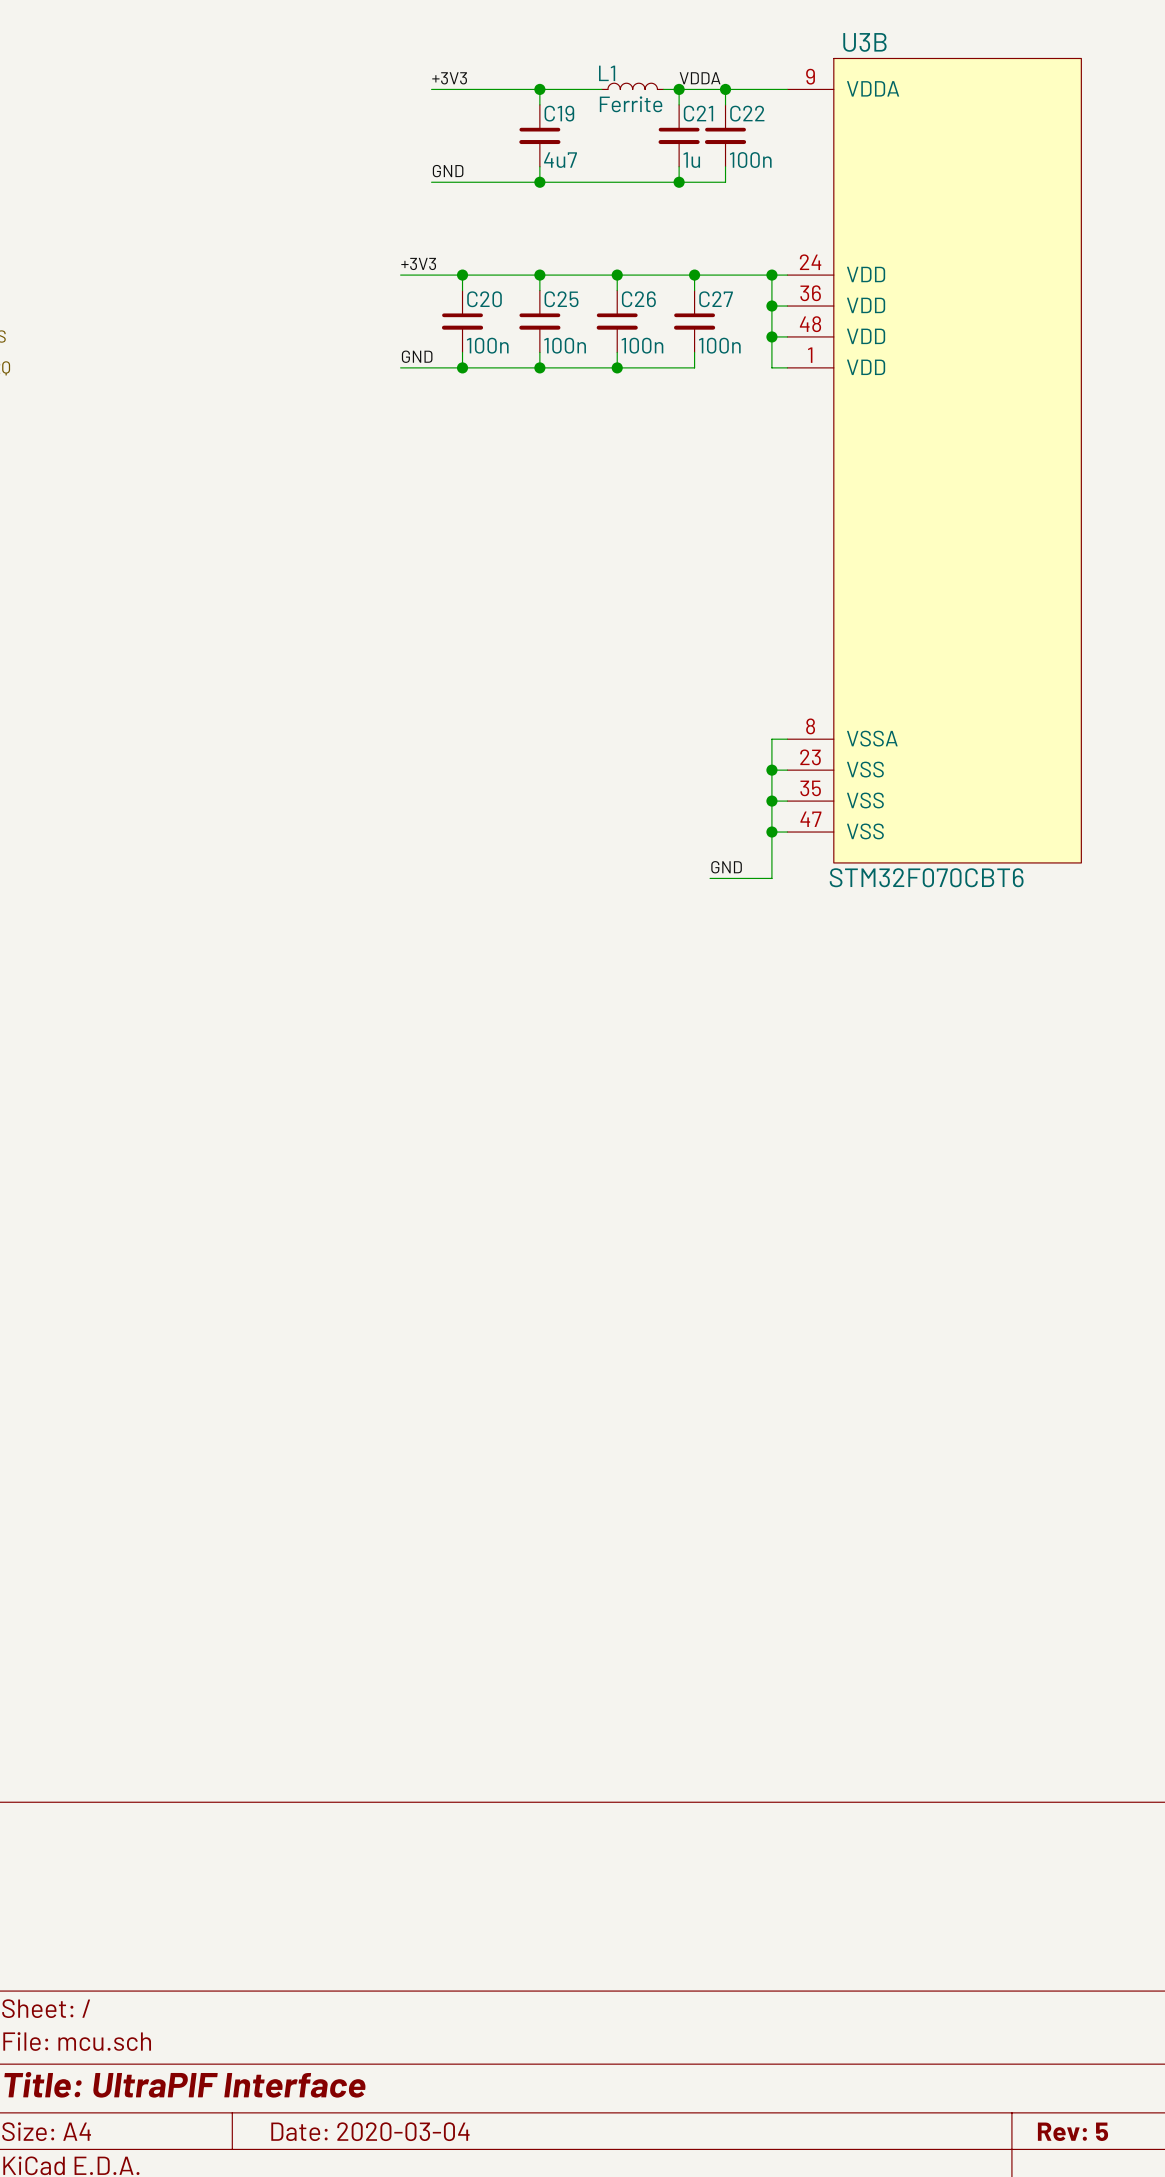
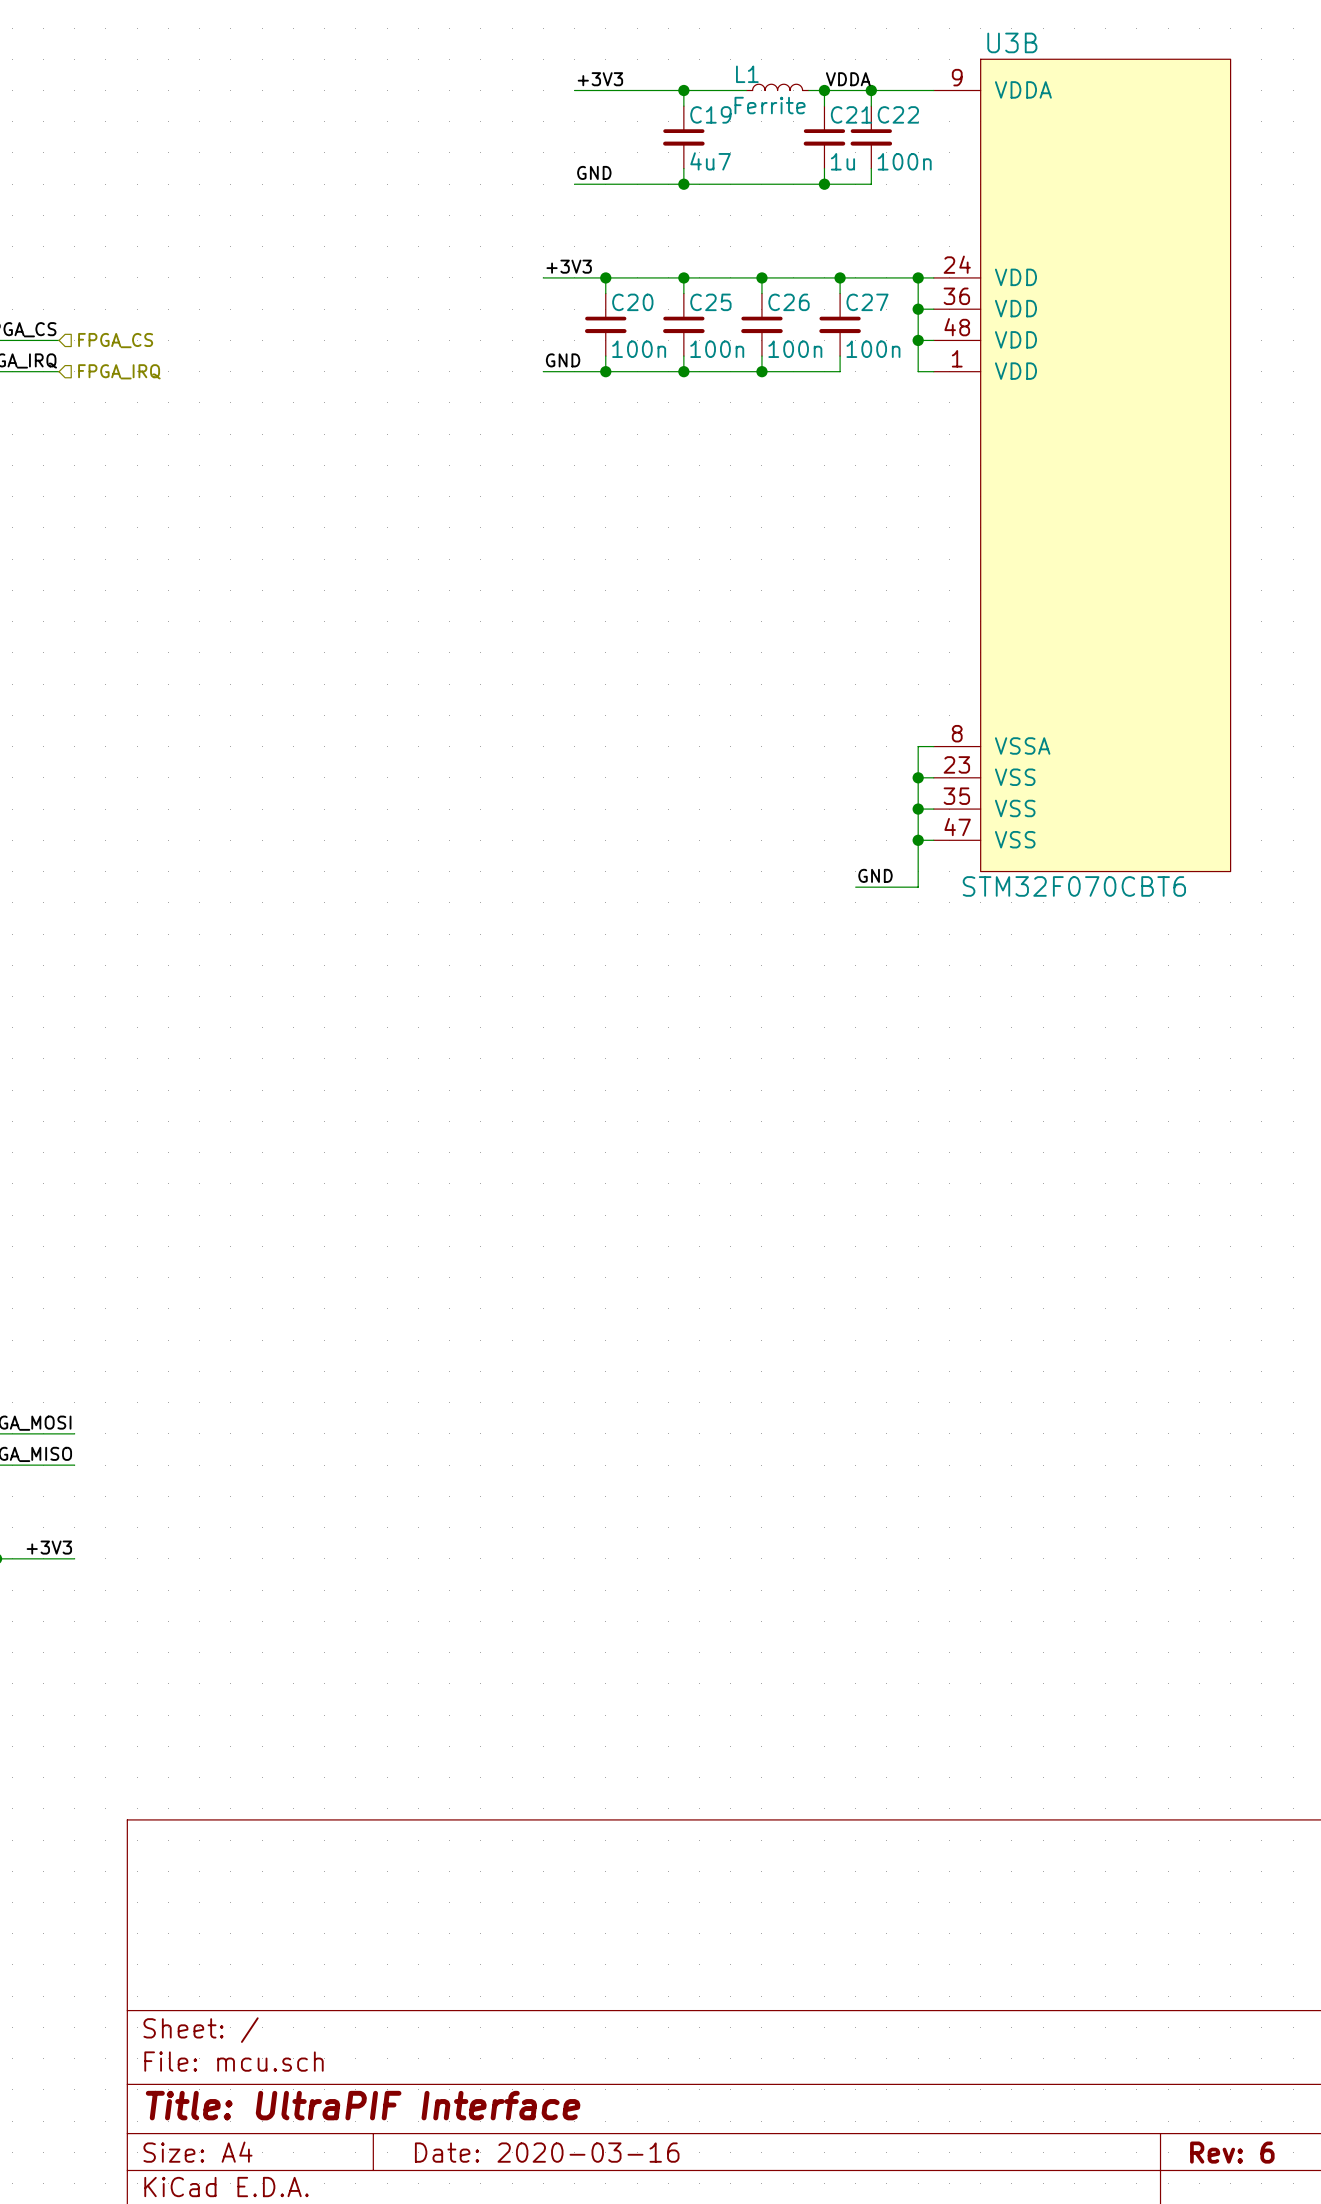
title block: Date: 2020-03-04 (370, 2131) -> Date: 2020-03-16 (547, 2152)
title block: Rev: 5 (1072, 2131) -> Rev: 6 (1232, 2152)

